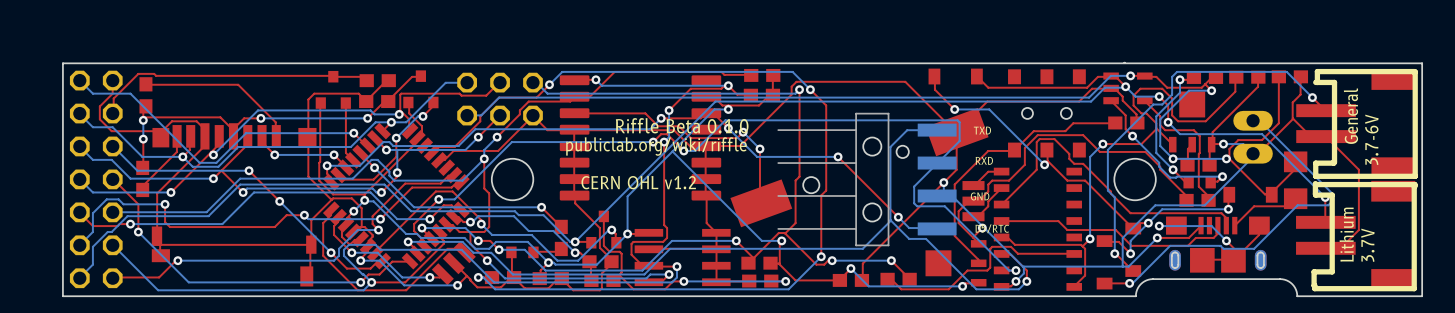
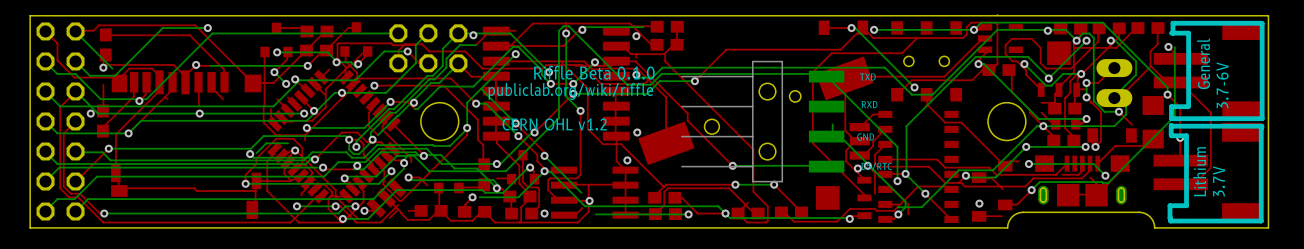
top track: none -> (566, 22) (566, 33)
top track: (154, 73) (156, 75) (333, 76) -> (113, 25) (195, 25) (252, 83)
bottom track: none -> (643, 27) (585, 27) (582, 29)
top track: (1130, 75) (1156, 76) (1167, 87) (1201, 87) (1211, 77) (1215, 77) -> (1058, 89) (1059, 86) (1073, 72) (1073, 43) (1080, 37) (1080, 28)
bottom track: (1130, 75) (1110, 75) (1089, 97) (598, 97) -> (550, 83) (541, 74) (541, 70) (518, 46)
via: (1130, 75) -> none
bottom track: none -> (207, 28) (162, 28) (115, 75) (89, 75) (75, 61)
via: none -> (207, 28)
top track: (934, 76) (934, 89) (954, 109) -> (824, 28) (851, 28)
bottom track: none -> (851, 28) (855, 28) (914, 87)
via: none -> (851, 28)
top track: none -> (862, 27) (840, 49) (726, 49) (694, 81)
top track: (1278, 76) (1278, 123) (1262, 140) (1238, 140) (1229, 148) (1229, 158) (1265, 194) (1271, 194) (1295, 168) (1295, 161) -> (1137, 28) (1116, 47) (1073, 47)
top track: none -> (582, 29) (579, 29) (563, 46) (510, 46)
via: none -> (582, 29)
bottom track: none -> (874, 29) (974, 29) (981, 22) (1102, 22) (1167, 87) (1167, 94)
via: none -> (874, 29)
via: none -> (974, 29)
top track: (132, 79) (113, 98) (112, 113) -> (93, 30) (75, 31)
bottom track: (595, 79) (601, 85) (728, 85) -> none
via position: (595, 79) -> (515, 54)
bottom track: (1180, 79) (1180, 92) (1156, 116) (1156, 152) (1173, 169) -> none
bottom track: (79, 80) (92, 93) (130, 93) (199, 162) -> none
top track: (112, 80) (112, 93) (99, 106) (99, 119) -> (45, 31) (57, 43) (57, 60) (63, 66)
bottom track: none -> (75, 31) (112, 68)
top track: none -> (496, 31) (489, 31) (476, 45)
bottom track: (445, 82) (406, 122) (375, 122) (350, 147) (238, 147) (218, 166) (192, 166) (182, 156) (142, 156) (140, 154) -> (378, 33) (212, 33) (146, 99) (100, 99)
bottom track: (536, 82) (547, 93) (795, 93) (799, 89) -> (461, 33) (510, 33) (549, 72)
bottom track: none -> (566, 33) (566, 96) (580, 110)
via: none -> (566, 33)
top track: (1091, 83) (1097, 76) (1111, 76) (1115, 76) (1125, 86) -> (966, 34) (966, 27) (971, 22) (995, 22) (997, 24) (997, 64) (991, 70) (988, 70)
top track: (549, 84) (536, 97) (499, 97) (480, 116) (480, 121) (454, 147) (438, 147) (436, 148) -> none
bottom track: (549, 84) (562, 71) (792, 71) (810, 89) -> none
via: (1125, 86) -> none
top track: (799, 89) (799, 176) (795, 180) (795, 223) (785, 233) -> none
via: (799, 89) -> none
top track: (810, 89) (826, 105) (826, 190) (821, 195) (821, 256) -> none
via: (810, 89) -> none
bottom track: (1211, 90) (1188, 90) (1160, 119) (1160, 146) (1173, 158) (1226, 158) -> none
bottom track: none -> (1086, 40) (1048, 78) (1028, 56) (975, 56) (906, 126) (905, 173) (925, 193)
via: none -> (1086, 40)
bottom track: none -> (1110, 40) (1115, 40) (1136, 61) (1136, 74) (1115, 96) (1126, 107) (1126, 114) (1114, 126) (1037, 126) (992, 170) (958, 170) (921, 207) (897, 207)
via: none -> (1110, 40)
top track: (744, 94) (737, 94) (728, 85) (721, 88) (690, 88) (669, 110) -> (650, 44) (632, 26)
bottom track: none -> (476, 45) (459, 45) (446, 58) (446, 67) (434, 79) (429, 79) (425, 82)
top track: (574, 96) (570, 101) (528, 101) (519, 110) (519, 114) (497, 137) -> none
top track: (1159, 96) (1168, 105) (1168, 122) -> none
bottom track: (1159, 96) (1135, 96) (1125, 86) (1104, 87) (1091, 101) (715, 101) (575, 241) (570, 241) (543, 215) (518, 215) (514, 211) (411, 211) (384, 184) (240, 184) (208, 216) (127, 216) (92, 246) (92, 264) -> (534, 132) (531, 132) (500, 164) (441, 164) (426, 148) (378, 148) (365, 162) (338, 162) (323, 176) (97, 176) (74, 199) (57, 199)
via: (1159, 96) -> none
bottom track: (592, 97) (499, 97) (481, 115) (467, 115) -> (513, 46) (473, 86) (439, 87)
bottom track: (1312, 97) (1286, 71) (1177, 71) (1172, 76) (1172, 94) (1162, 104) (1153, 104) (1107, 149) (1107, 190) (1114, 197) (1114, 253) -> none
top track: (1111, 100) (1125, 115) (1125, 129) (1132, 136) -> none
top track: (1144, 100) (1160, 116) (1160, 125) (1165, 130) (1193, 130) (1199, 136) (1199, 152) -> (1081, 73) (1077, 73) (1070, 81) (1070, 92) (1065, 97)
top track: (366, 101) (358, 93) (314, 93) (308, 99) (308, 137) -> (306, 50) (273, 82) (253, 82)
via: none -> (407, 51)
bottom track: none -> (277, 52) (327, 52) (337, 62) (350, 62) (357, 68)
via: none -> (277, 52)
top track: (345, 103) (345, 152) -> (287, 51) (287, 59) (274, 72)
top track: none -> (987, 51) (978, 60) (978, 64)
bottom track: none -> (515, 54) (467, 102) (467, 128) (450, 146) (377, 145) (364, 157)
bottom track: (728, 109) (714, 109) (627, 196) (627, 233) -> (850, 218) (730, 218) (718, 206) (585, 206) (550, 172) (544, 171)
via: (728, 109) -> none
bottom track: (954, 109) (989, 109) (1044, 164) -> none
via: (954, 109) -> none
bottom track: (669, 110) (669, 137) (664, 142) -> none
via: (669, 110) -> none
top track: (713, 113) (728, 128) -> (622, 61) (635, 61) (687, 113) (687, 120) (732, 165)
bottom track: (399, 114) (374, 114) (370, 110) (257, 110) (213, 154) -> none
bottom track: none -> (594, 62) (573, 83)
via: none -> (594, 62)
top track: none -> (398, 63) (398, 50) (405, 44) (422, 44) (429, 51) (465, 51) (482, 68) (542, 68) (546, 64) (582, 64) (602, 83)
top track: (500, 115) (478, 137) -> (428, 63) (419, 63) (407, 51)
top track: (532, 115) (498, 150) (453, 150) (444, 159) (439, 160) -> (377, 135) (368, 126) (368, 112) (372, 109) (373, 104)
bottom track: none -> (458, 63) (439, 82) (431, 82) (377, 135)
bottom track: (423, 116) (418, 116) (396, 138) -> none
via: none -> (978, 64)
bottom track: none -> (1024, 64) (1046, 85) (1051, 85) (1063, 73) (1081, 73)
via: none -> (1024, 64)
via position: (260, 118) -> (196, 64)
bottom track: (661, 118) (650, 129) (505, 129) -> (458, 33) (442, 48) (442, 65) (432, 75)
via: (661, 118) -> none
top track: none -> (1115, 66) (1098, 82) (1086, 82)
bottom track: (143, 120) (143, 139) -> none
bottom track: (757, 120) (725, 120) (694, 150) (683, 150) -> (662, 67) (652, 77) (636, 77)
bottom track: (957, 120) (959, 122) (959, 141) (914, 186) (914, 203) (917, 206) (944, 206) (1009, 270) (1015, 270) -> (845, 67) (884, 67) (911, 94) (932, 94) (997, 29) (1065, 29) (1076, 40) (1082, 33) (1089, 33) (1093, 37) (1093, 100) (1104, 111) (1118, 111)
bottom track: (1253, 120) (1260, 121) (1333, 194) (1333, 200) (1328, 205) (1297, 205) (1254, 248) (1223, 248) (1220, 245) -> (1174, 46) (1174, 116) (1108, 182) (1084, 182)
via: (391, 122) -> none
top track: (1137, 122) (1136, 114) (1122, 100) (1122, 96) (1114, 88) (1092, 88) (1079, 101) (987, 101) (958, 130) -> (944, 76) (846, 76)
bottom track: (1168, 122) (1180, 134) (1262, 134) (1325, 197) -> none
via: (1168, 122) -> none
top track: (1107, 123) (1073, 123) -> (987, 40) (980, 40) (950, 70)
bottom track: none -> (274, 72) (286, 83)
via: none -> (274, 72)
via: none -> (549, 72)
top track: (658, 126) (678, 126) (690, 138) -> (572, 73) (587, 88) (587, 128) (603, 144) (621, 144) (663, 186)
via: none -> (1081, 73)
bottom track: (728, 128) (757, 156) (838, 156) -> none
top track: (1156, 128) (1141, 144) (1102, 144) -> none
bottom track: (499, 129) (475, 129) (458, 146) (393, 146) (389, 142) (383, 142) (359, 165) (327, 165) -> (427, 75) (394, 109) (388, 109) (356, 141) (356, 146)
top track: (574, 129) (674, 130) (690, 147) (740, 146) (791, 94) (791, 86) (796, 81) (905, 81) (957, 132) (956, 169) (862, 263) (861, 280) -> (655, 214) (664, 205) (664, 191) (667, 188) (729, 188) (754, 213) (758, 213)
bottom track: (937, 130) (907, 130) (890, 147) (890, 220) (909, 238) (926, 238) (976, 289) (1018, 289) (1026, 281) -> none
top track: (1066, 130) (1033, 131) (1030, 134) -> (982, 70) (972, 80) (911, 80)
bottom track: (743, 132) (760, 148) -> none
via: (743, 132) -> none
top track: none -> (844, 78) (845, 130) (854, 141) (859, 141)
via: none -> (1048, 78)
bottom track: (353, 133) (246, 133) (216, 162) -> (407, 51) (384, 51) (355, 80) (299, 80) (273, 106) (170, 106)
bottom track: none -> (694, 81) (659, 81) (647, 93) (573, 93)
via: none -> (694, 81)
top track: (247, 136) (247, 145) (213, 178) -> (198, 82) (198, 106)
bottom track: (1132, 136) (1159, 162) (1159, 166) (1170, 177) (1177, 176) -> (978, 64) (983, 64) (1038, 118) (1045, 118)
via: (1132, 136) -> none
top track: (307, 137) (308, 176) (331, 199) -> none
bottom track: (478, 137) (465, 149) (386, 149) -> none
via: (478, 137) -> none
via: (497, 137) -> none
bottom track: none -> (1086, 82) (1086, 97)
via: none -> (1086, 82)
via: none -> (286, 83)
top track: (396, 138) (396, 156) (373, 179) (350, 179) -> (367, 51) (364, 51) (325, 89) (325, 107) (312, 120) (292, 121)
via: (396, 138) -> none
top track: none -> (353, 84) (357, 78) (450, 78) (476, 103)
via: none -> (550, 83)
top track: none -> (573, 83) (550, 83)
via: none -> (573, 83)
via: (143, 139) -> none
via: none -> (374, 85)
top track: (653, 142) (661, 134) (667, 134) (683, 150) -> none
bottom track: (653, 142) (511, 142) -> none
via: (653, 142) -> none
top track: (664, 142) (664, 225) (667, 228) -> (580, 110) (580, 165)
via: (664, 142) -> none
bottom track: none -> (481, 88) (515, 123)
bottom track: (1102, 144) (1090, 156) (1090, 238) -> none
via: (1102, 144) -> none
bottom track: (1223, 144) (1243, 144) (1253, 153) (1252, 157) (1204, 205) (1155, 205) (1122, 237) (1122, 266) -> none
via: (1223, 144) -> none
via: none -> (341, 92)
top track: none -> (573, 93) (534, 132)
via: none -> (573, 93)
top track: (760, 148) (760, 202) -> (560, 61) (584, 61) (592, 69) (637, 68) (666, 97) (666, 142)
via: (760, 148) -> none
via: (386, 149) -> none
bottom track: (397, 149) (397, 172) -> none
bottom track: (484, 149) (484, 158) (462, 180) (394, 180) (389, 175) (389, 171) (377, 159) (371, 159) (352, 178) -> (428, 33) (415, 45) (415, 63) (386, 92) (334, 92) (306, 120) (294, 120)
bottom track: none -> (414, 94) (396, 112) (390, 112) (370, 132) (370, 142) (359, 154) (353, 154) (349, 149) (349, 139) (345, 136) (263, 136) (251, 148) (108, 148)
top track: none -> (1167, 94) (1180, 107) (1180, 137)
via: none -> (1167, 94)
via: (683, 150) -> none
top track: (1014, 150) (988, 150) (954, 184) (954, 235) -> (917, 37) (901, 53) (831, 53) (812, 72) (812, 143) (842, 173)
bottom track: (672, 151) (761, 240) (781, 240) -> none
top track: (1145, 151) (1099, 151) (1083, 135) (1037, 135) (1024, 148) (1024, 164) (1009, 180) (992, 180) (988, 184) (988, 191) (979, 200) (973, 201) -> (1016, 96) (1011, 91) (1011, 69)
top track: none -> (1086, 97) (1100, 111) (1100, 141) (1095, 146)
via: none -> (1086, 97)
via: (213, 154) -> none
via: (274, 154) -> none
bottom track: (334, 154) (274, 154) -> none
via: (334, 154) -> none
top track: (838, 156) (898, 217) -> none
via: (838, 156) -> none
top track: none -> (390, 101) (407, 101) (414, 109)
bottom track: none -> (390, 101) (364, 127) (306, 127)
via: none -> (390, 101)
top track: (484, 158) (484, 188) (489, 193) (489, 227) (484, 232) (459, 232) (452, 225) (447, 225) -> (467, 127) (467, 135) (401, 200) (383, 184) (384, 171) (380, 167) (380, 163)
via: (1173, 158) -> none
via: (1226, 158) -> none
bottom track: (92, 159) (111, 159) (130, 178) (184, 178) -> (57, 103) (60, 106) (154, 106)
bottom track: none -> (476, 103) (486, 103) (518, 136)
via: none -> (476, 103)
via position: (1044, 164) -> (914, 87)
via: (327, 165) -> none
bottom track: (488, 165) (454, 199) (438, 199) -> (417, 109) (414, 109)
bottom track: (374, 167) (414, 207) (541, 207) -> none
via: none -> (580, 110)
top track: none -> (1118, 111) (1132, 124)
via: none -> (1118, 111)
via: (1173, 169) -> none
via: none -> (90, 113)
top track: (221, 170) (243, 192) -> none
top track: (249, 170) (279, 201) -> none
bottom track: none -> (304, 113) (199, 113)
via: none -> (304, 113)
top track: (397, 172) (397, 176) (381, 192) -> none
via: (397, 172) -> none
top track: (453, 175) (448, 175) (440, 183) (405, 183) (372, 216) (372, 224) (378, 230) -> (386, 118) (386, 122) (382, 126) (385, 132)
bottom track: none -> (141, 120) (128, 133)
via: (213, 178) -> none
bottom track: (240, 178) (206, 212) (112, 212) -> (191, 120) (167, 120)
top track: (112, 179) (138, 204) (138, 232) -> (75, 121) (63, 133) (63, 186) (70, 193) (79, 193) (99, 213) (104, 213)
top track: none -> (515, 123) (544, 152) (544, 155)
via: none -> (515, 123)
top track: (461, 182) (456, 182) (451, 187) (412, 187) (380, 219) -> (393, 124) (423, 155)
via: (943, 182) -> none
via: none -> (1043, 126)
via: none -> (306, 127)
via: none -> (467, 127)
top track: (452, 191) (435, 191) (375, 253) -> (330, 196) (332, 191) (324, 184) (319, 184) (314, 189)
via: none -> (534, 132)
via: none -> (637, 132)
via: (243, 192) -> none
bottom track: (381, 192) (376, 192) (372, 188) (247, 188) (243, 192) -> none
via: (381, 192) -> none
top track: none -> (518, 136) (537, 155) (537, 161) (544, 168) (544, 171)
via: none -> (518, 136)
via: none -> (349, 139)
top track: (438, 199) (414, 224) (414, 231) (423, 240) (424, 246) -> none
via: (364, 200) -> none
bottom track: (279, 201) (331, 252) -> none
via: (279, 201) -> none
bottom track: none -> (287, 143) (266, 143) (256, 153)
top track: (165, 204) (165, 222) (170, 227) (274, 227) (286, 215) (304, 215) -> none
bottom track: (165, 204) (123, 204) (118, 199) (106, 199) (92, 213) (92, 232) -> none
via: (165, 204) -> none
top track: (1001, 204) (1036, 169) (1036, 142) (1039, 139) (1054, 139) (1069, 153) (1069, 158) (1074, 163) (1083, 163) (1130, 213) (1221, 213) (1225, 217) (1226, 225) -> (885, 144) (874, 155) (874, 164) (877, 166) (929, 166) (945, 182) (961, 182) (965, 186) (1025, 186) (1033, 178) (1082, 178) (1089, 171) (1090, 163)
top track: (451, 205) (443, 205) (429, 219) -> (384, 145) (381, 142) (367, 142) (357, 132) (341, 132) (314, 159)
via: none -> (356, 146)
top track: (541, 207) (560, 226) -> (374, 85) (443, 85) (477, 119) (477, 139) (483, 145) (483, 164)
via: (541, 207) -> none
via: none -> (1026, 146)
bottom track: none -> (1085, 146) (1026, 146) (995, 177) (965, 177)
via: none -> (1085, 146)
via: none -> (1095, 146)
top track: none -> (108, 148) (75, 181)
via: none -> (108, 148)
bottom track: (1228, 209) (1162, 209) (1130, 240) (1130, 253) -> none
via: (1228, 209) -> none
bottom track: (353, 211) (364, 200) (373, 201) (406, 233) (417, 233) (421, 237) (464, 237) (475, 248) (489, 248) (496, 241) (527, 241) (548, 262) (555, 264) (596, 264) (598, 262) -> (479, 197) (518, 197)
top track: (79, 212) (92, 226) (130, 224) -> none
bottom track: none -> (45, 151) (57, 164) (305, 164) (310, 159) (314, 159)
top track: (338, 217) (338, 222) (334, 226) (334, 234) (351, 252) -> (281, 155) (286, 155) (289, 151) (296, 151) (335, 190) (335, 196) (358, 218) (368, 218) (376, 210) (376, 208)
bottom track: none -> (423, 155) (419, 155) (415, 152) (380, 152) (363, 169) (353, 169)
via: none -> (423, 155)
bottom track: none -> (544, 155) (581, 192)
via: none -> (544, 155)
bottom track: (898, 217) (909, 228) -> (732, 165) (801, 165)
via: (898, 217) -> none
via: (380, 219) -> none
bottom track: (416, 219) (397, 219) (370, 192) (254, 192) (222, 224) (130, 224) -> (351, 157) (346, 152) (312, 152) (304, 160) (110, 160) (102, 152) (75, 151)
via: (429, 219) -> none
bottom track: (890, 220) (862, 248) -> (774, 184) (758, 184)
via: none -> (314, 159)
via: (470, 222) -> none
via: none -> (627, 160)
via: (1148, 223) -> none
via: (130, 224) -> none
bottom track: (481, 224) (492, 234) (531, 234) (557, 260) (578, 260) (609, 230) -> (342, 218) (368, 218) (396, 190) (482, 190) (485, 192) (503, 192) (528, 167)
via: (481, 224) -> none
bottom track: none -> (404, 163) (404, 168) (373, 199) (88, 199) (75, 211)
via: none -> (404, 163)
top track: (311, 226) (311, 244) (309, 244) (160, 244) (156, 236) -> (256, 164) (245, 174) (245, 183)
bottom track: (1211, 226) (1226, 240) -> (1076, 164) (1093, 164) (1105, 175)
bottom track: (422, 228) (465, 228) (478, 240) -> none
via: none -> (732, 165)
top track: (982, 228) (972, 237) -> (867, 165) (874, 173) (874, 184)
bottom track: (357, 230) (339, 248) (339, 255) (334, 260) (177, 260) -> (298, 167) (59, 167) (57, 169)
via: (378, 230) -> none
top track: none -> (323, 167) (324, 169) (353, 169)
via: none -> (323, 167)
top track: (439, 231) (443, 243) (405, 282) (371, 282) -> (373, 169) (372, 164) (363, 155) (363, 144) (359, 139) (349, 139)
via: none -> (857, 168)
bottom track: (138, 232) (188, 282) (360, 282) -> none
via: (138, 232) -> none
top track: (470, 232) (470, 243) (487, 260) -> none
bottom track: none -> (391, 171) (378, 183) (245, 183)
via: none -> (391, 171)
top track: none -> (905, 173) (885, 174)
via: none -> (905, 173)
top track: (1001, 237) (1008, 237) (1014, 244) (1081, 244) (1085, 248) (1085, 275) (1074, 286) -> (925, 193) (951, 219)
bottom track: (1157, 237) (1128, 266) (1023, 267) -> none
via: (1157, 237) -> none
top track: (1195, 237) (1187, 245) (1131, 245) (1123, 237) -> (1027, 174) (996, 174)
via: none -> (1105, 175)
bottom track: none -> (346, 176) (376, 176) (396, 155) (414, 155) (429, 171) (505, 171) (558, 118) (558, 30) (563, 26) (568, 26) (627, 84) (650, 84) (661, 73) (824, 73) (897, 146) (897, 181)
top track: (736, 240) (753, 257) (748, 263) -> none
bottom track: (736, 240) (672, 240) (642, 270) (545, 270) (524, 249) (499, 249) -> none
via: (736, 240) -> none
top track: (781, 240) (779, 242) (779, 264) -> none
via: (781, 240) -> none
via: (1226, 240) -> none
bottom track: (408, 241) (462, 241) (473, 252) (491, 252) (512, 274) (644, 274) (670, 248) (837, 248) -> none
via position: (575, 241) -> (496, 164)
bottom track: none -> (411, 180) (493, 180) (498, 185)
top track: none -> (291, 180) (256, 180)
via: none -> (897, 181)
bottom track: (112, 245) (158, 290) (363, 290) (371, 282) (343, 255) (343, 249) (348, 244) (375, 244) (380, 249) (461, 249) (494, 282) (672, 282) (676, 277) (676, 266) -> none
bottom track: (1171, 245) (1132, 283) (1129, 283) -> (1039, 182) (1031, 190)
via: none -> (245, 183)
top track: (461, 248) (447, 248) (428, 267) -> (359, 182) (359, 187) (363, 191) (363, 201)
via: none -> (735, 184)
top track: none -> (774, 184) (784, 195)
top track: (990, 248) (992, 246) (1011, 246) (1017, 253) (1073, 253) -> (849, 209) (893, 210) (918, 186) (947, 186) (950, 189)
via: (499, 249) -> none
top track: (331, 252) (346, 268) (370, 268) -> (75, 91) (60, 107) (60, 188) (69, 197) (78, 197) (103, 222) (290, 222) (310, 202)
via: (331, 252) -> none
bottom track: (351, 252) (377, 252) (402, 277) (429, 277) -> none
via: (351, 252) -> none
top track: (1114, 253) (1133, 271) -> (1031, 190) (1017, 204) (1005, 204)
via: (1114, 253) -> none
via: (1130, 253) -> none
via: none -> (1031, 190)
top track: none -> (119, 190) (118, 188) (255, 191)
bottom track: (821, 256) (788, 289) (495, 289) (483, 277) (478, 277) -> none
via: (821, 256) -> none
top track: (990, 258) (990, 267) (987, 270) (967, 270) (962, 275) -> none
via: none -> (925, 193)
top track: (177, 260) (159, 277) (112, 278) -> none
via: (177, 260) -> none
bottom track: (360, 260) (379, 260) (404, 285) (457, 285) -> none
via: (360, 260) -> none
bottom track: (487, 260) (505, 278) (646, 278) (650, 274) (669, 274) -> none
via: (487, 260) -> none
top track: (832, 260) (828, 260) (824, 264) (816, 264) (784, 232) (778, 232) (749, 262) -> (735, 184) (666, 184) (655, 197)
via: (832, 260) -> none
bottom track: (891, 260) (832, 260) -> none
via position: (891, 260) -> (774, 184)
top track: (390, 263) (379, 274) (368, 274) (360, 282) -> (328, 198) (328, 209) (338, 218) (342, 218)
bottom track: (850, 268) (868, 286) (962, 286) -> none
via: (850, 268) -> none
via: none -> (979, 203)
via: (1015, 270) -> none
top track: none -> (398, 204) (380, 222) (356, 222) (340, 206) (335, 206)
via: none -> (296, 206)
bottom track: none -> (335, 206) (296, 206)
via: none -> (335, 206)
bottom track: none -> (355, 206) (345, 206) (338, 213) (104, 213)
via: none -> (355, 206)
via: (669, 274) -> none
via: (478, 277) -> none
via: none -> (104, 213)
top track: (613, 280) (619, 275) (633, 289) (665, 289) -> (519, 222) (578, 221)
via: none -> (544, 213)
via: none -> (725, 213)
top track: (839, 280) (826, 280) -> (738, 213) (747, 222) (766, 222) (767, 220) (767, 206) (753, 191) (753, 149) (665, 61) (664, 53)
top track: (683, 281) (673, 281) -> (588, 184) (588, 211) (585, 214)
via: (683, 281) -> none
via: (1026, 281) -> none
via: (360, 282) -> none
via: (371, 282) -> none
via: (1129, 283) -> none
via: (457, 285) -> none
via: none -> (342, 218)

